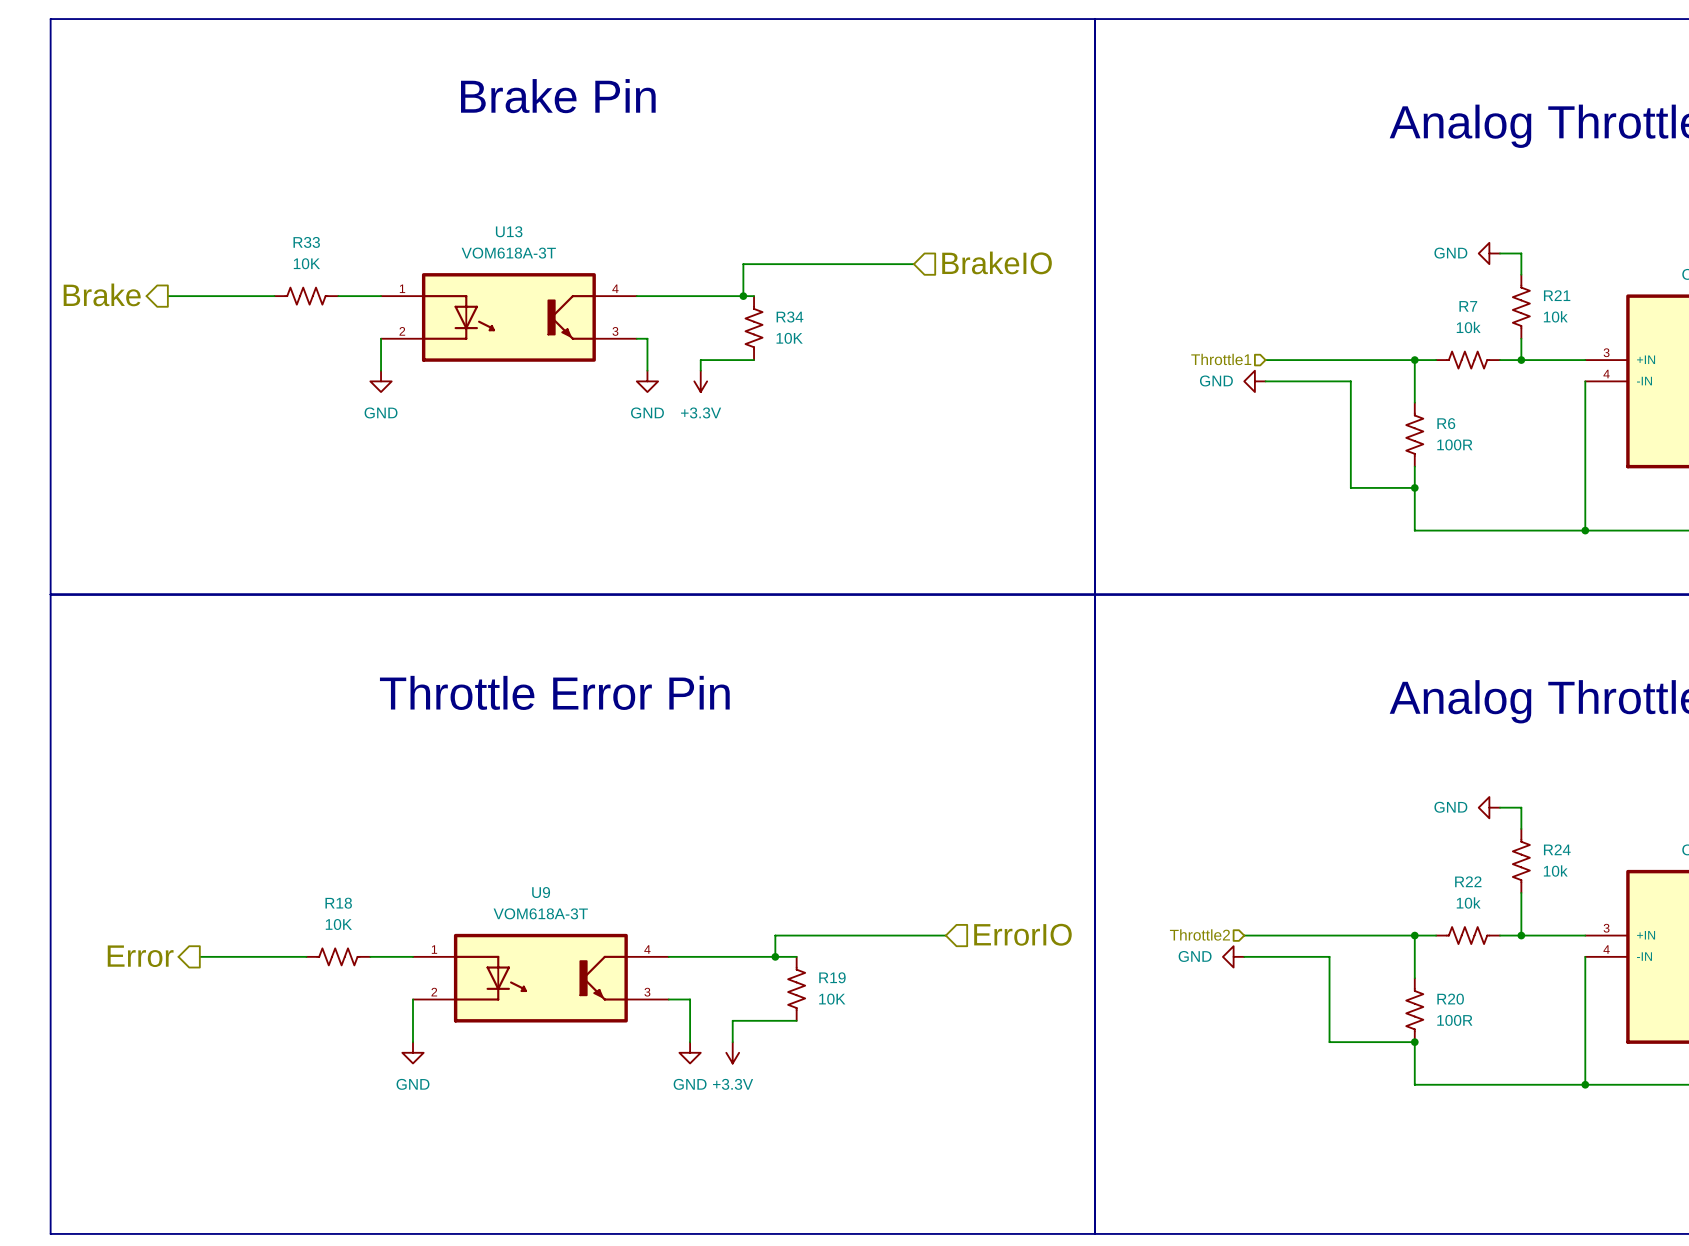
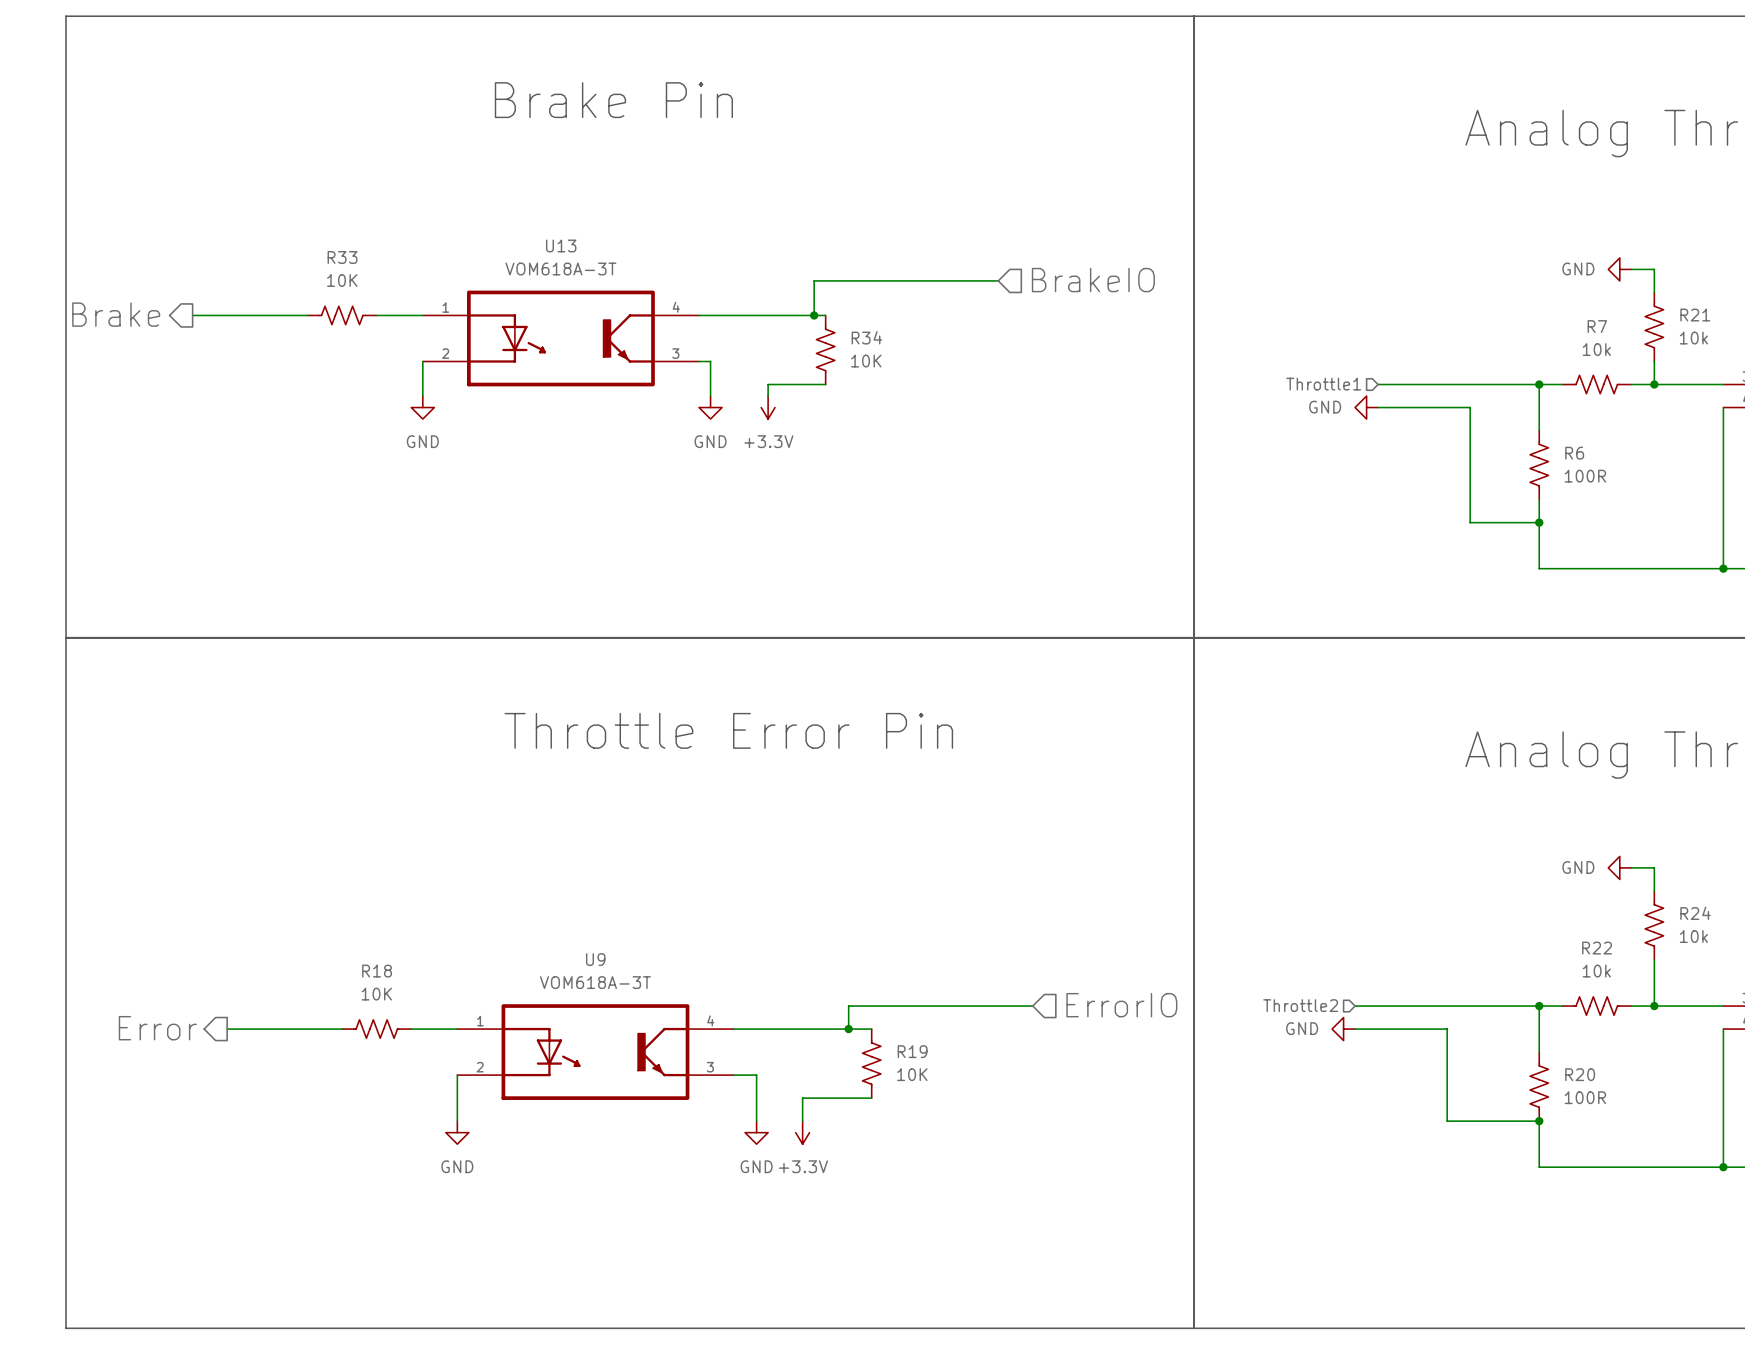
text position: Throttle Error Pin (554, 692) -> Throttle Error Pin (728, 730)

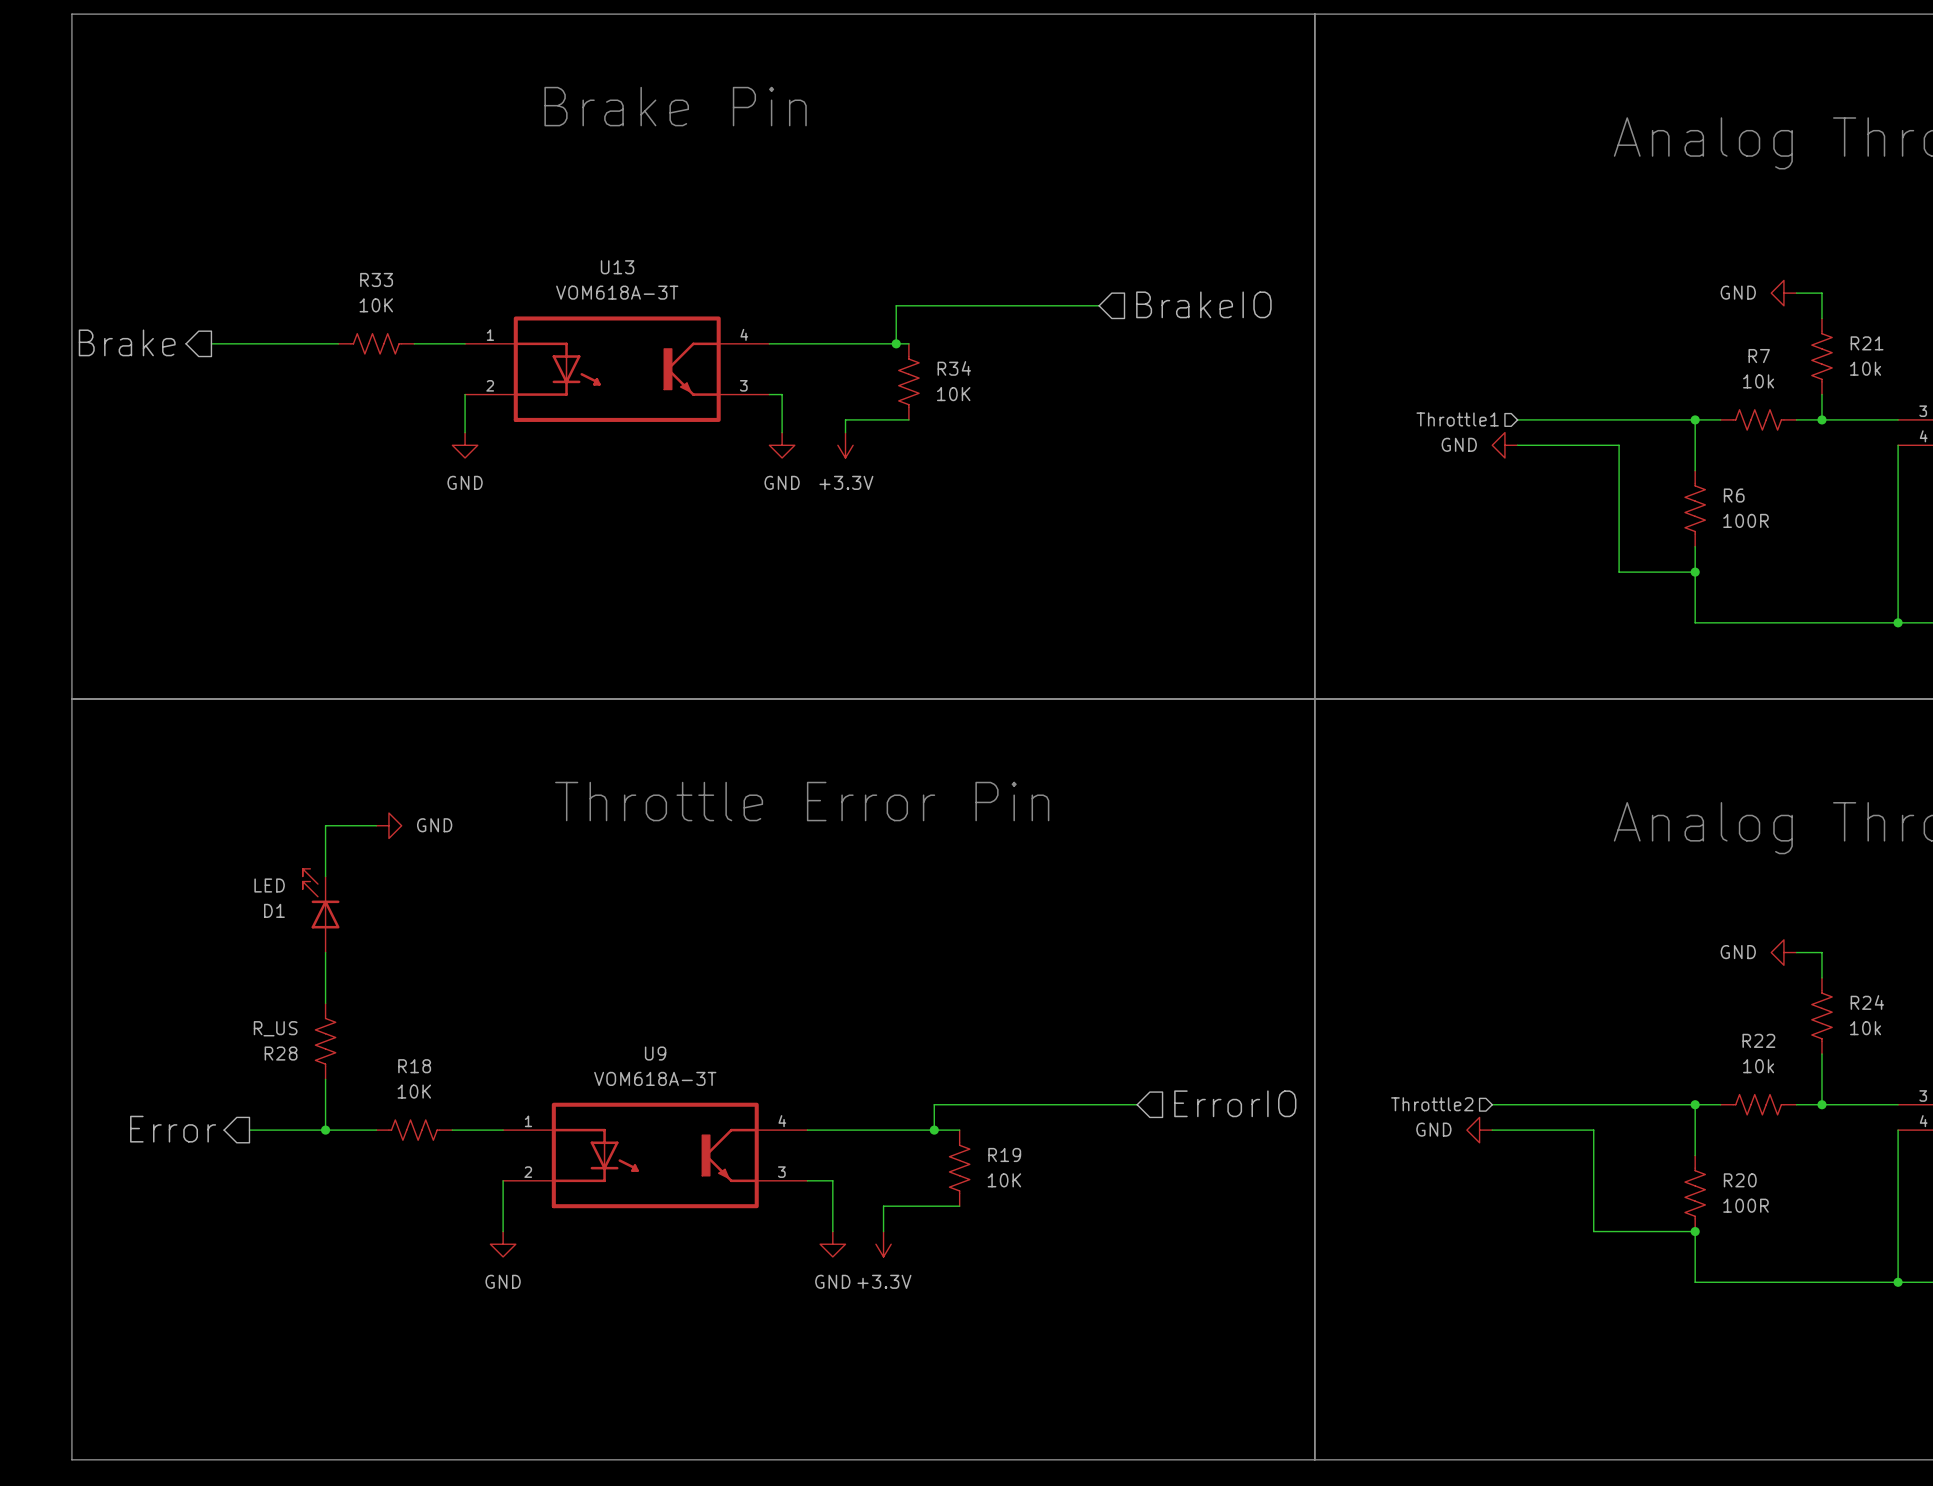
wire: none -> (376, 825) (325, 825) (325, 876)
power symbol: none -> GND (388, 825)
D1: none -> LED (321, 910)
wire: none -> (325, 952) (325, 1003)
R28: none -> R_US (325, 1041)
wire: none -> (325, 1079) (325, 1130)
junction: none -> (325, 1130)

